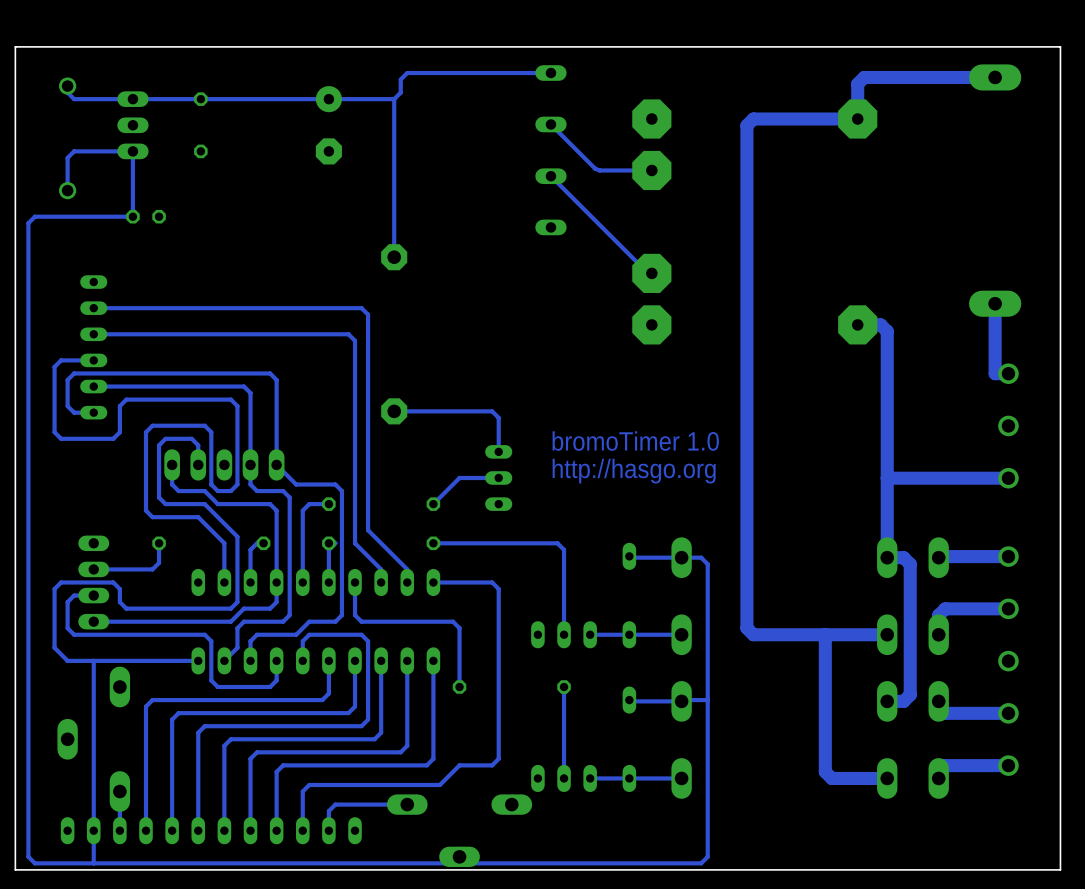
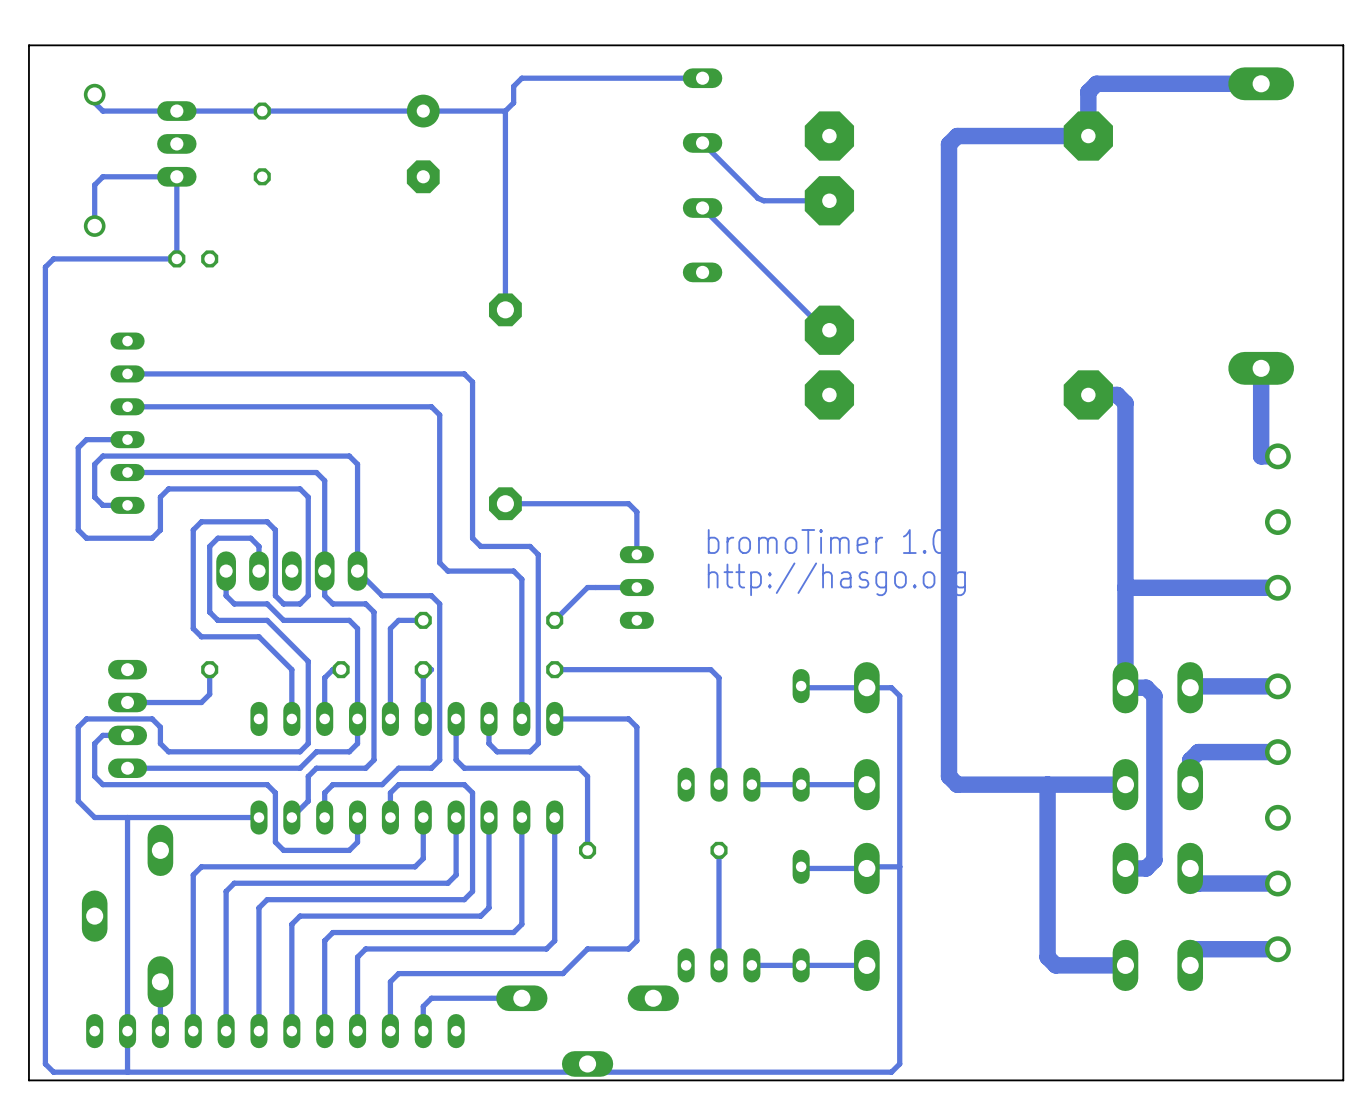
bottom track: (335, 334) (348, 334) (355, 340) (355, 543) (381, 569) (381, 582) -> (431, 406) (439, 415) (439, 562) (447, 571) (513, 571) (521, 579) (521, 702)
bottom track: (368, 438) (368, 530) (407, 569) -> (472, 538) (480, 546) (530, 546) (538, 554) (538, 743) (530, 751) (497, 751) (488, 743) (488, 718)

